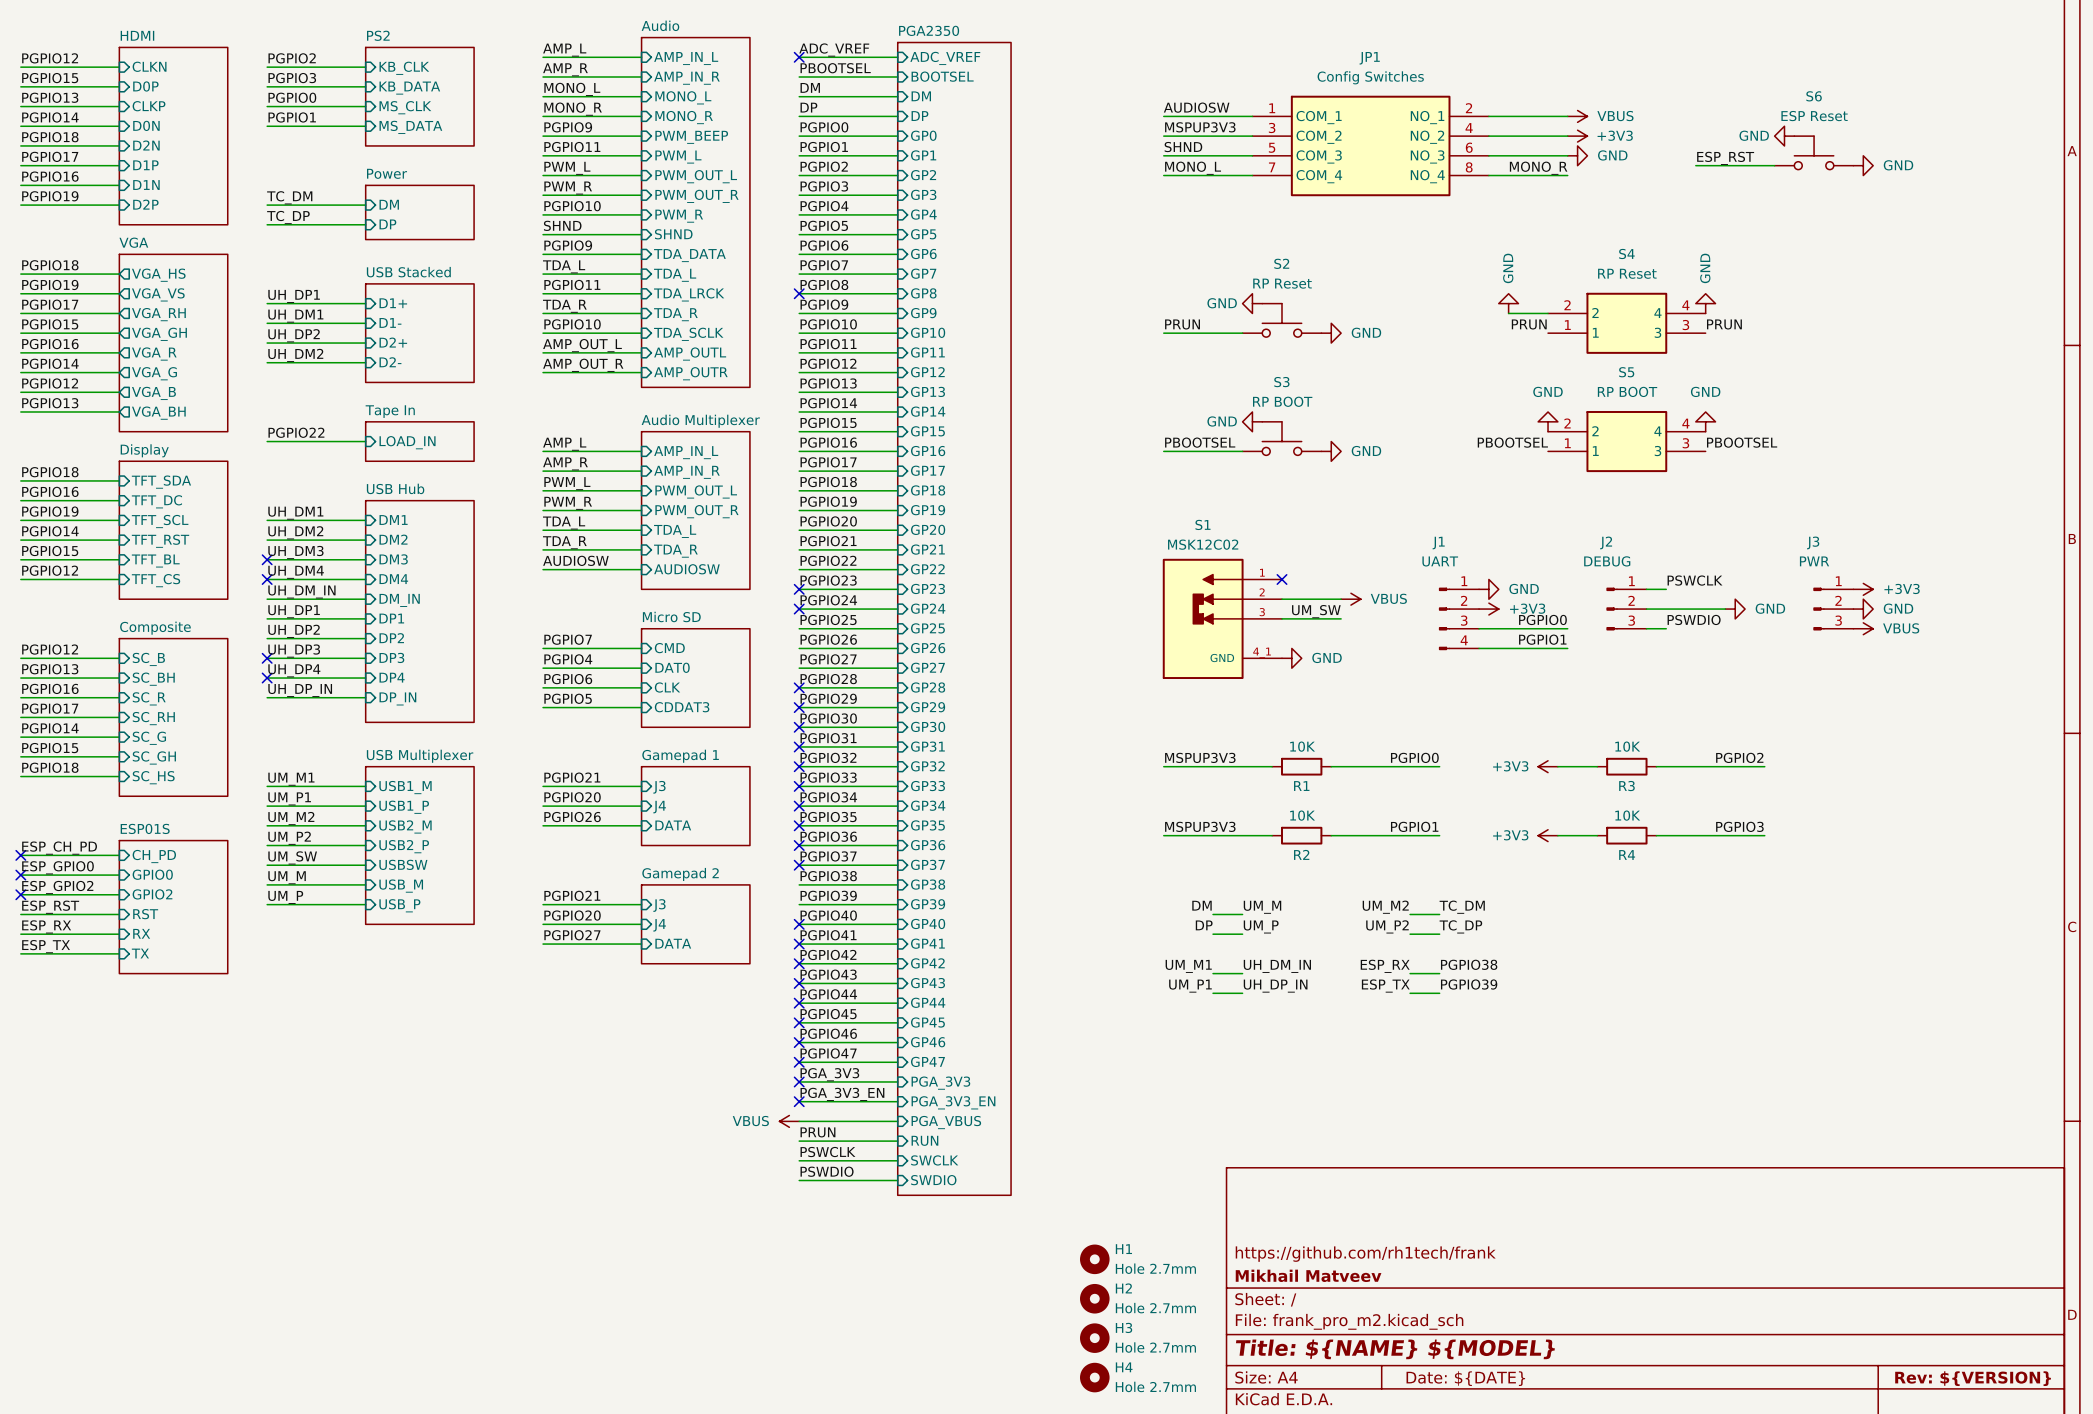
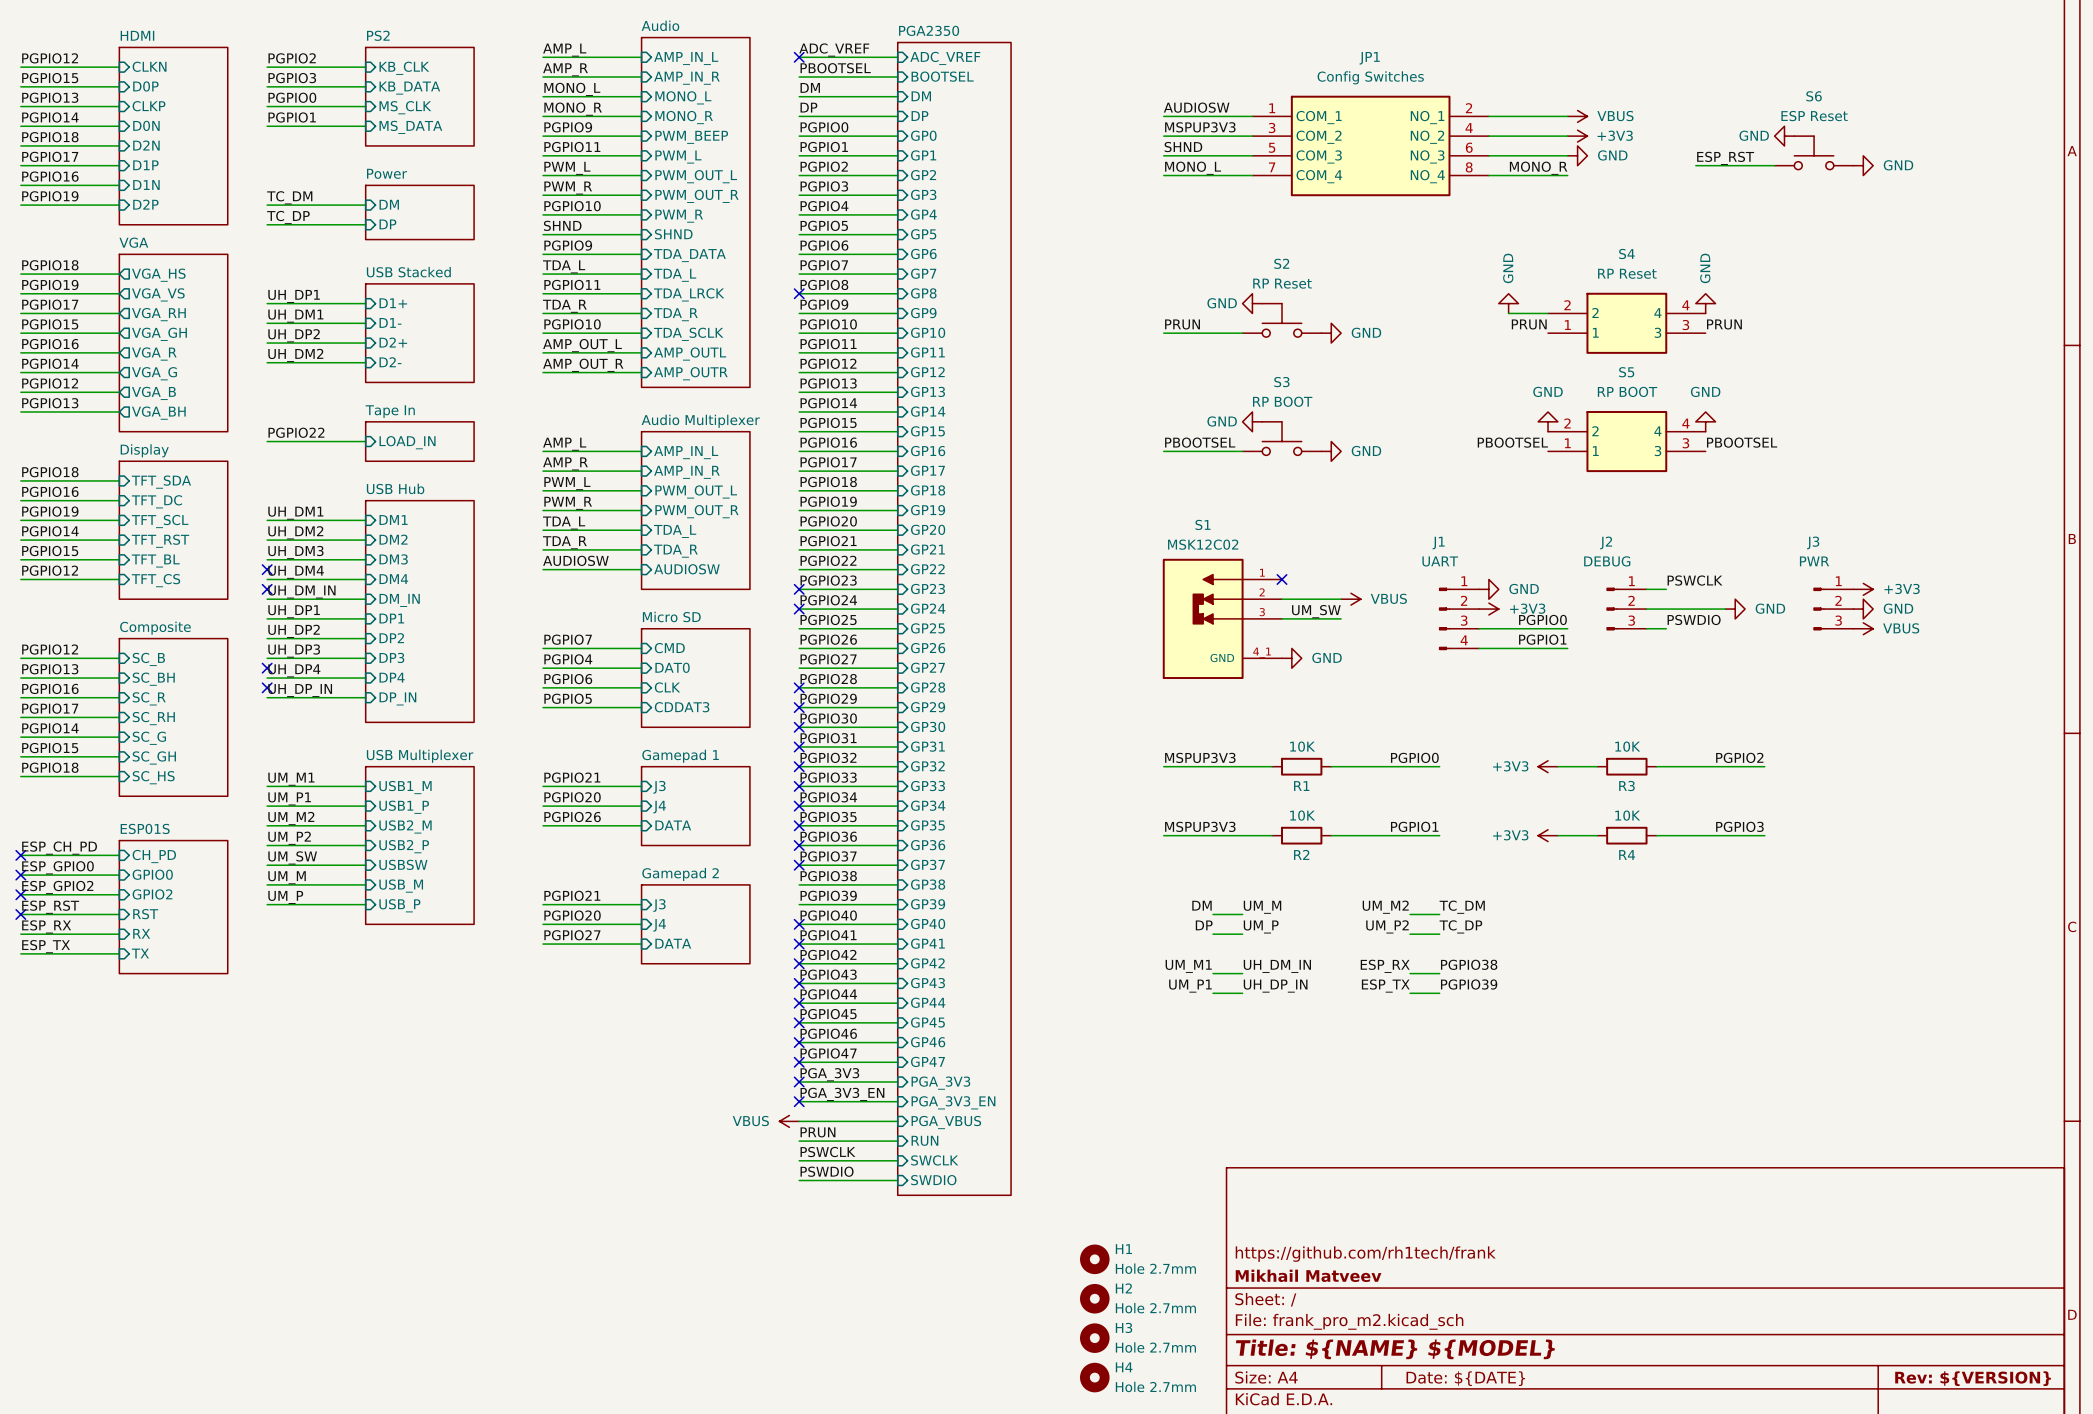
no-connect mark: (267, 559) -> none
no-connect mark: none -> (267, 569)
no-connect mark: (267, 579) -> none
no-connect mark: none -> (267, 589)
no-connect mark: (267, 658) -> none
no-connect mark: none -> (267, 668)
no-connect mark: (267, 678) -> none
no-connect mark: none -> (267, 687)
no-connect mark: none -> (20, 914)

